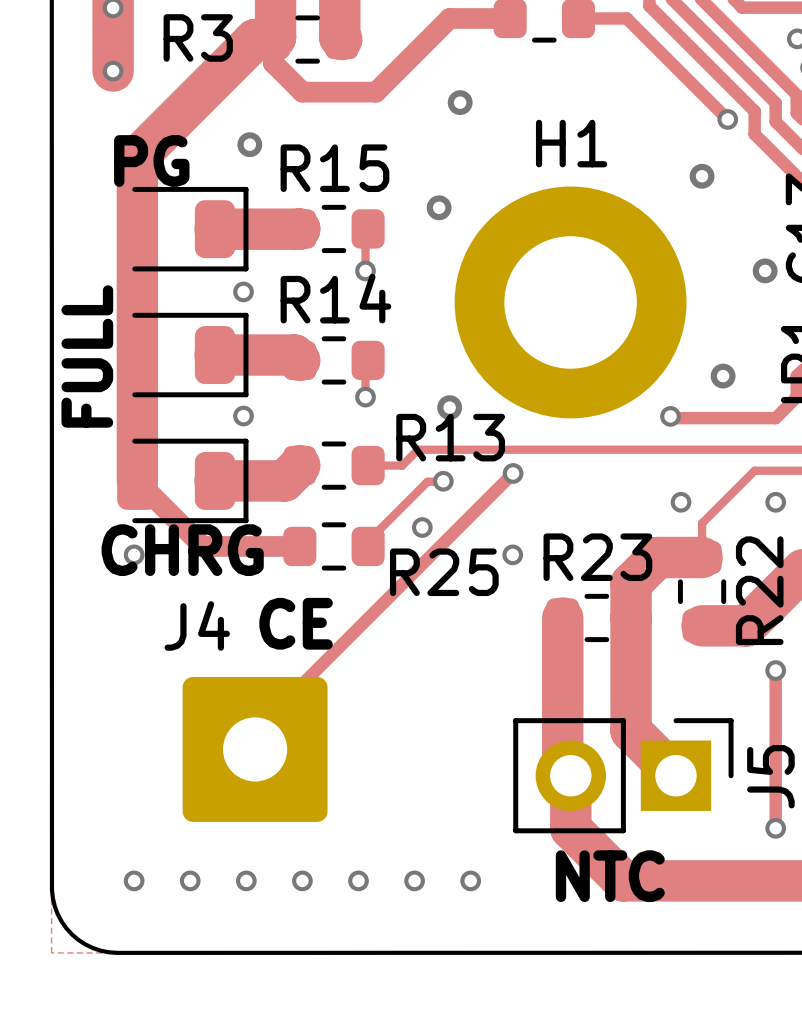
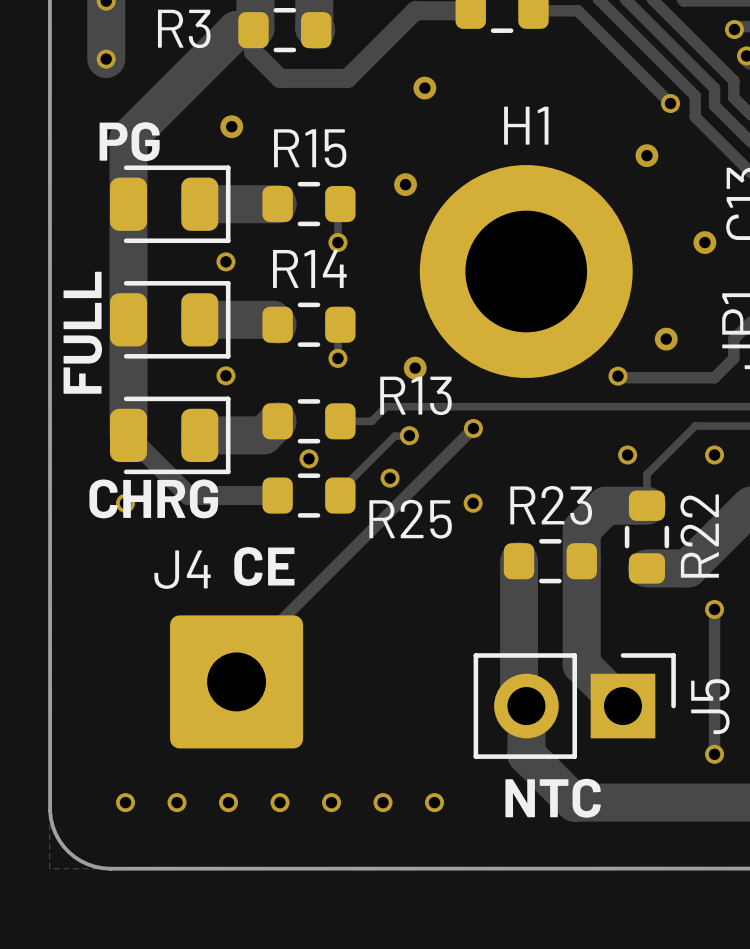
via: none -> (308, 458)

